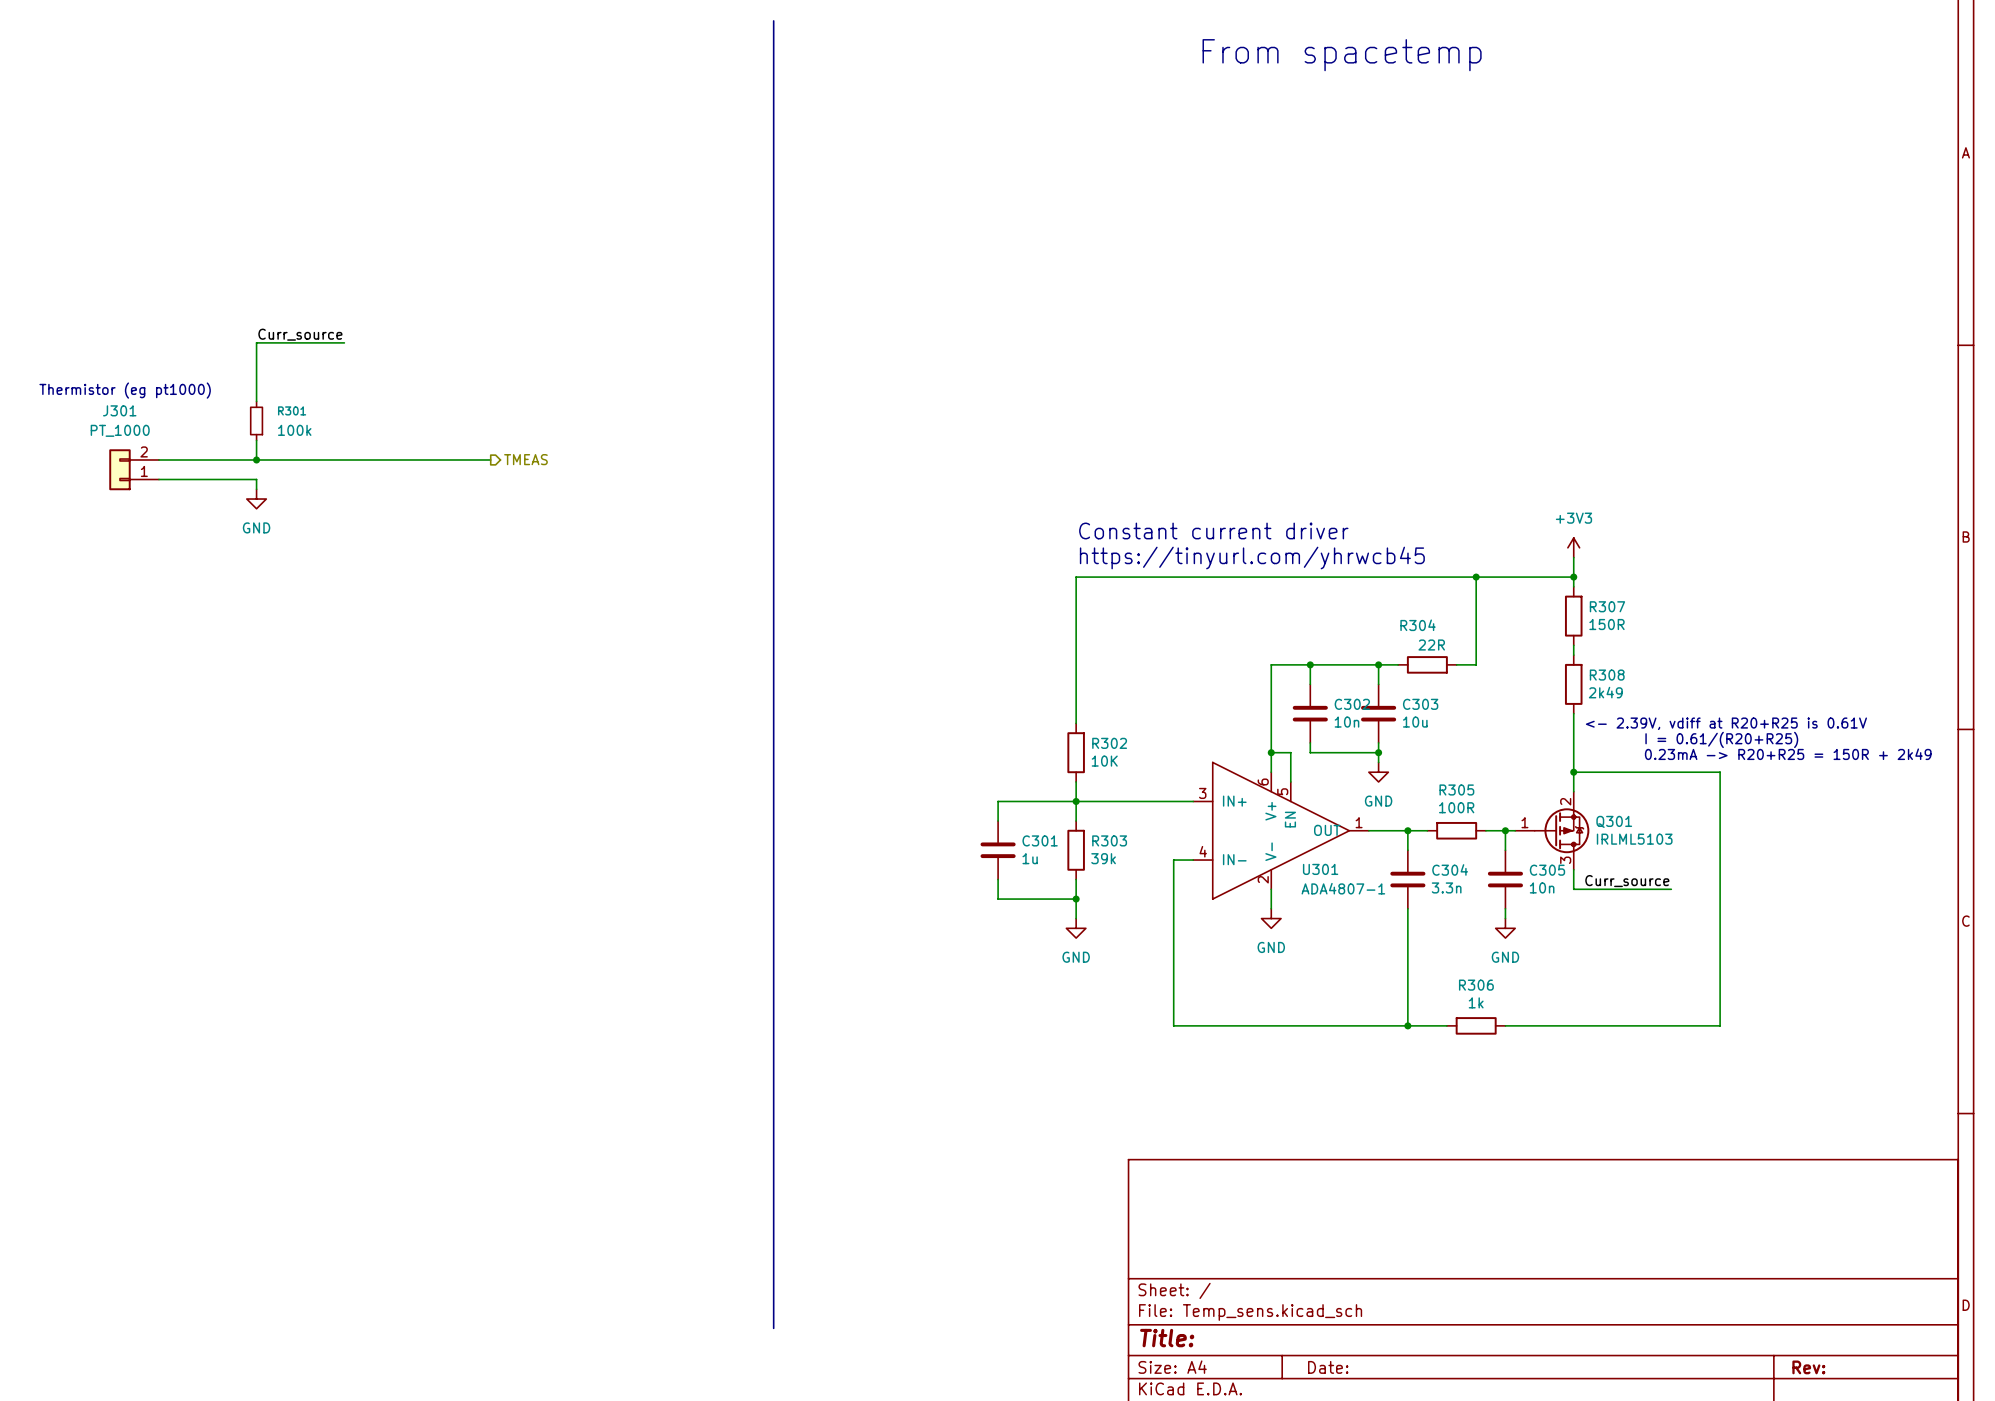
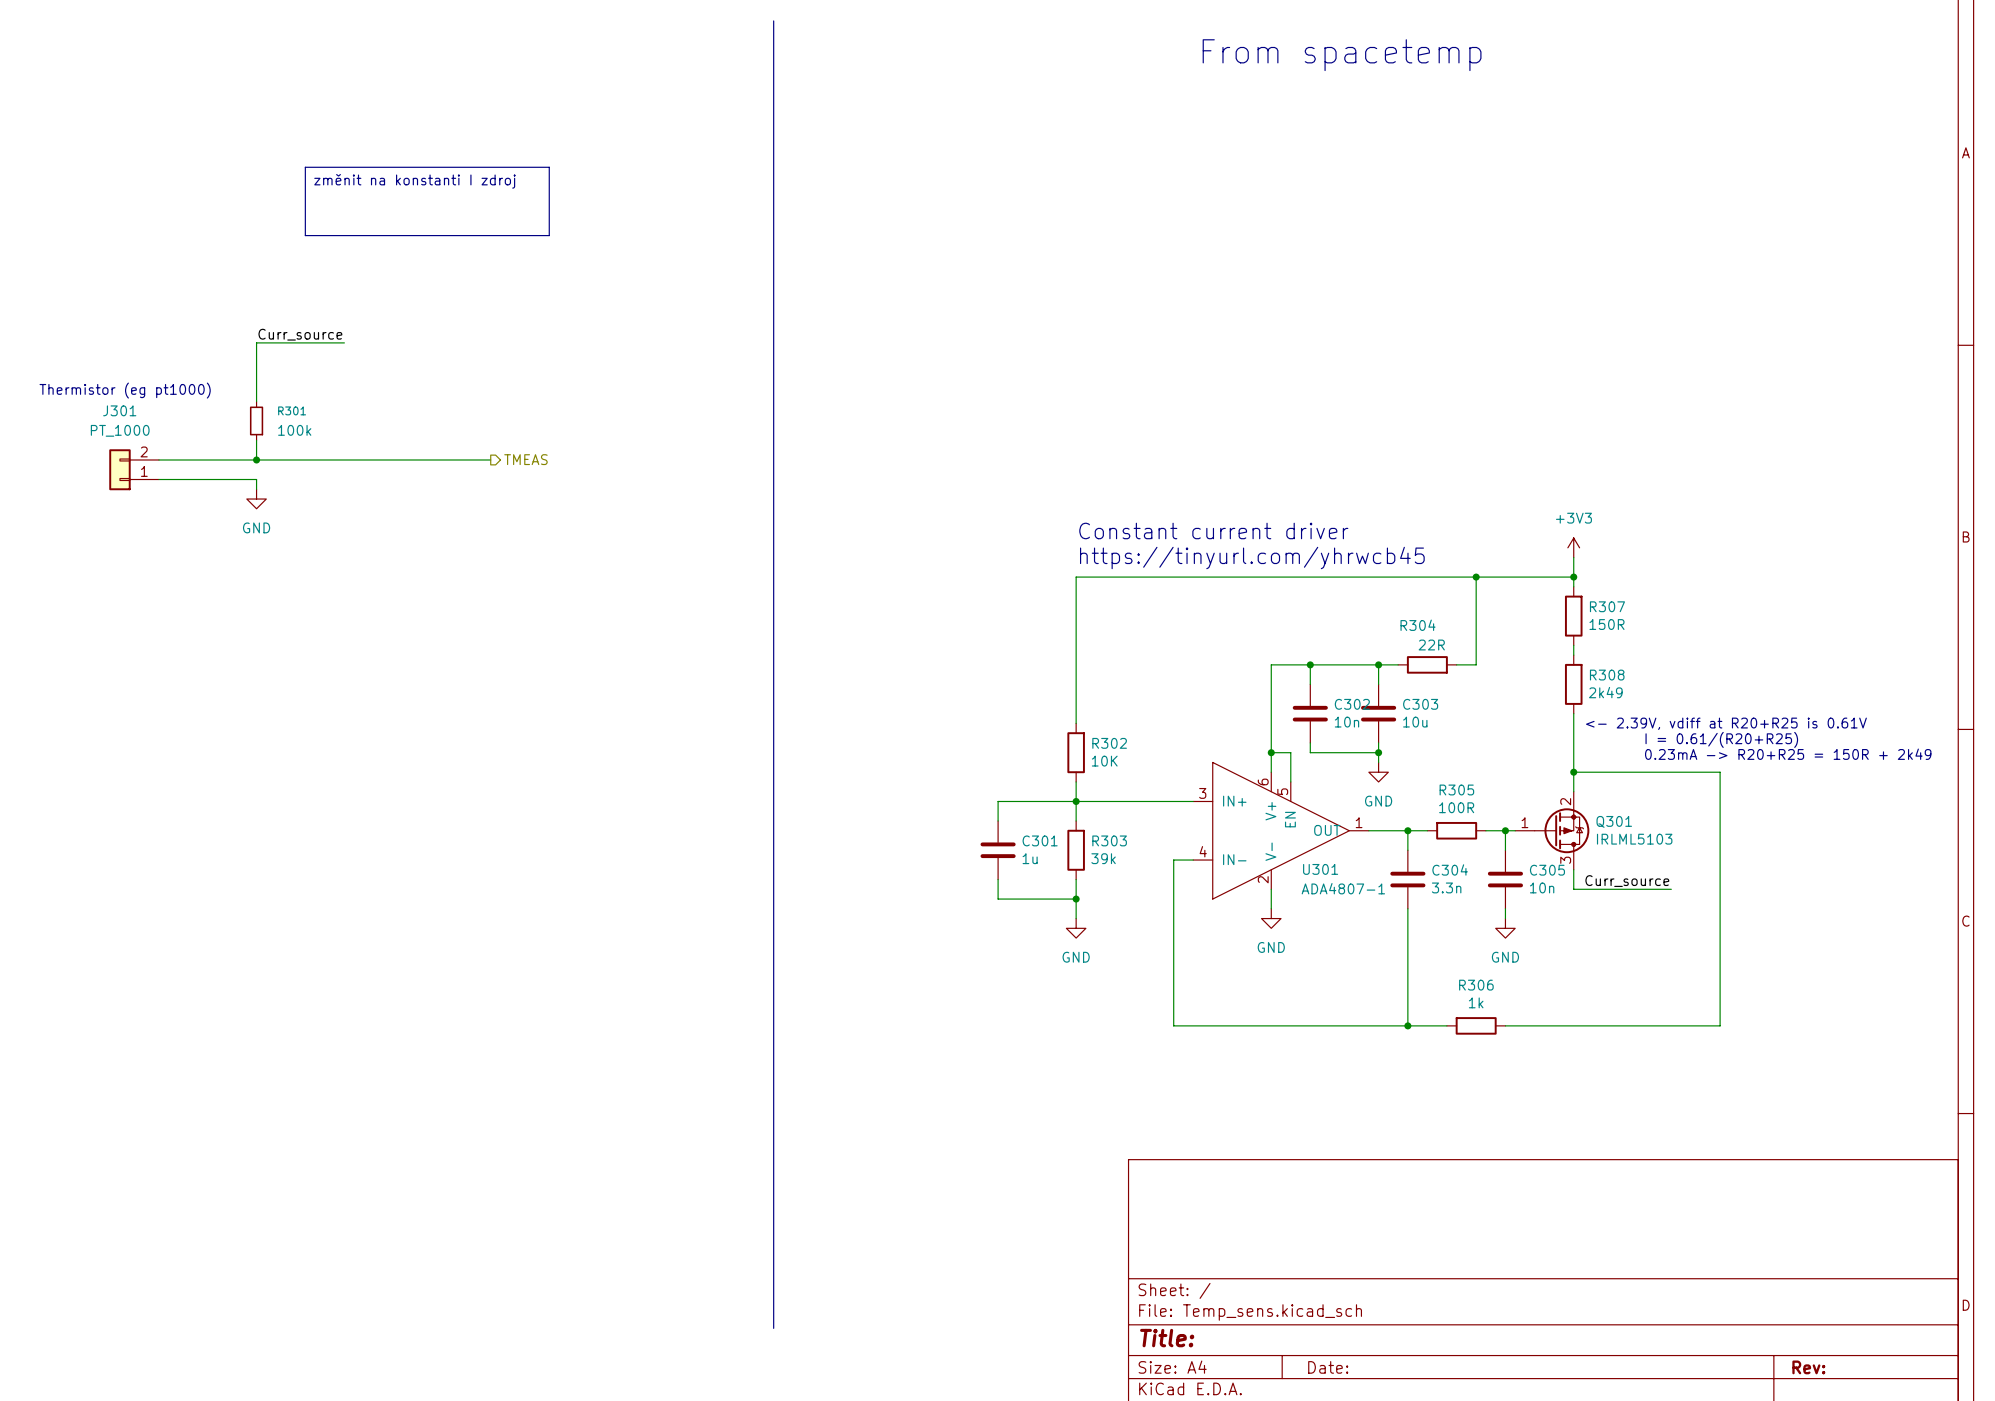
line: none -> (305, 167) (549, 167) (549, 235) (305, 235) (305, 167)
text: none -> změnit na konstanti I zdroj (414, 181)

